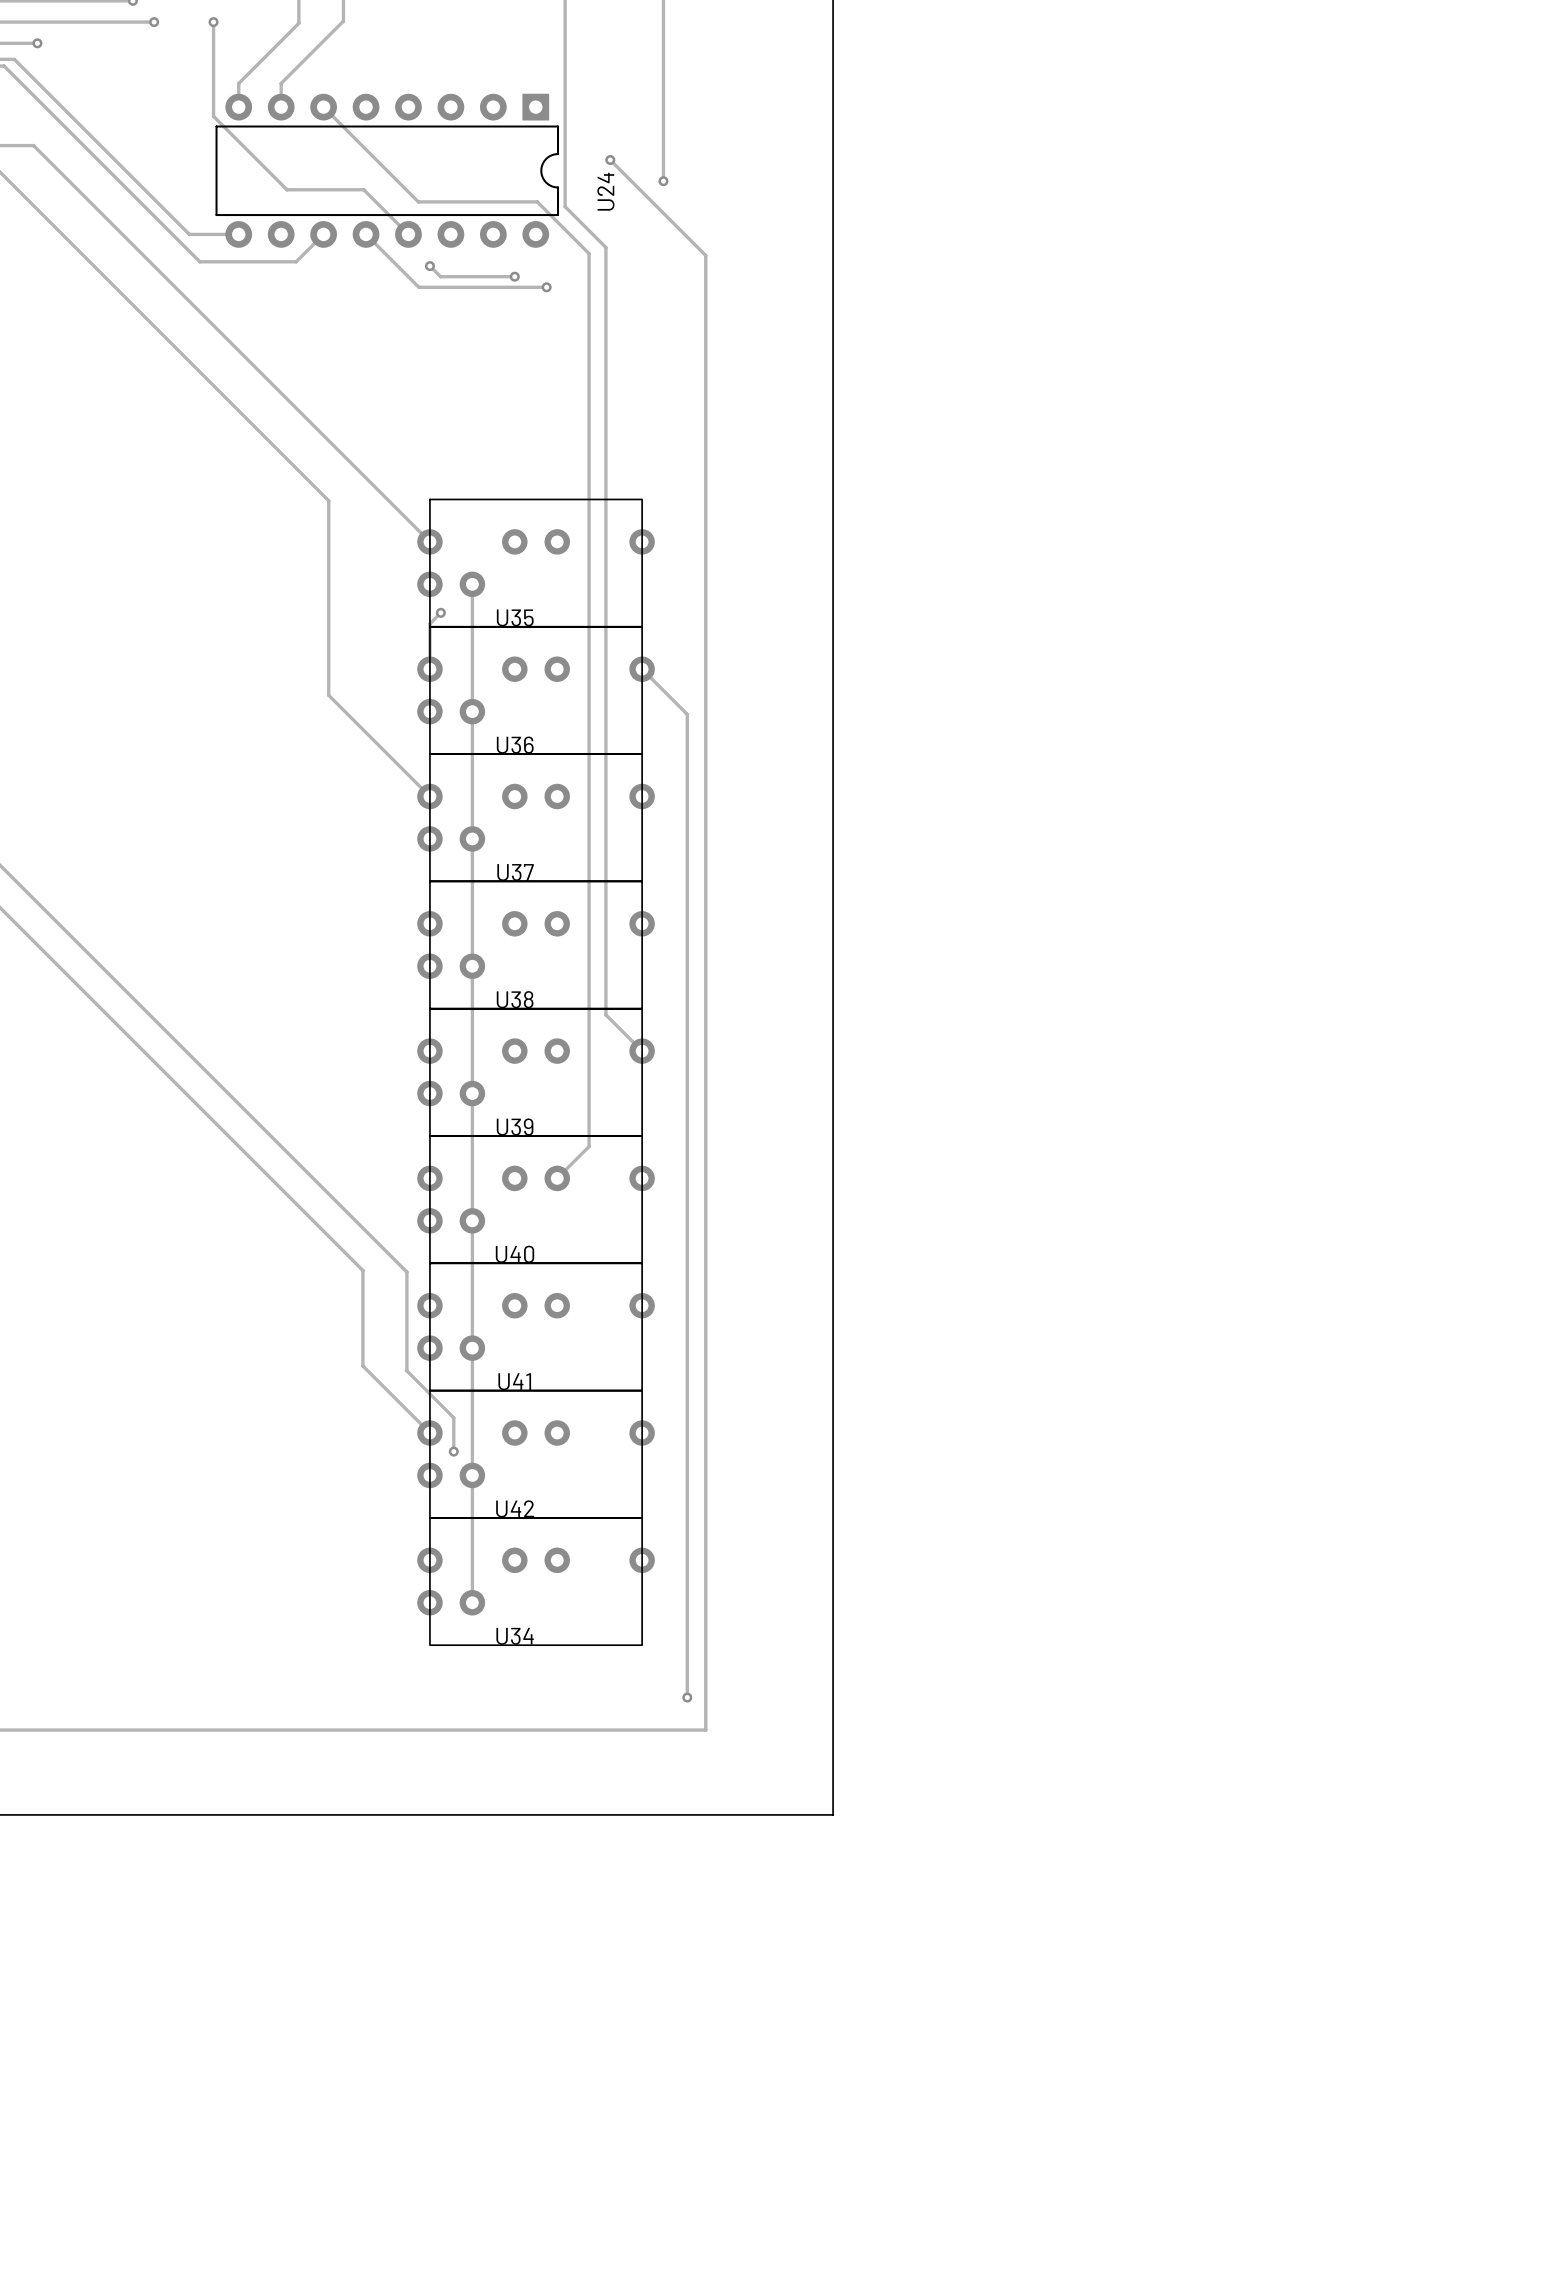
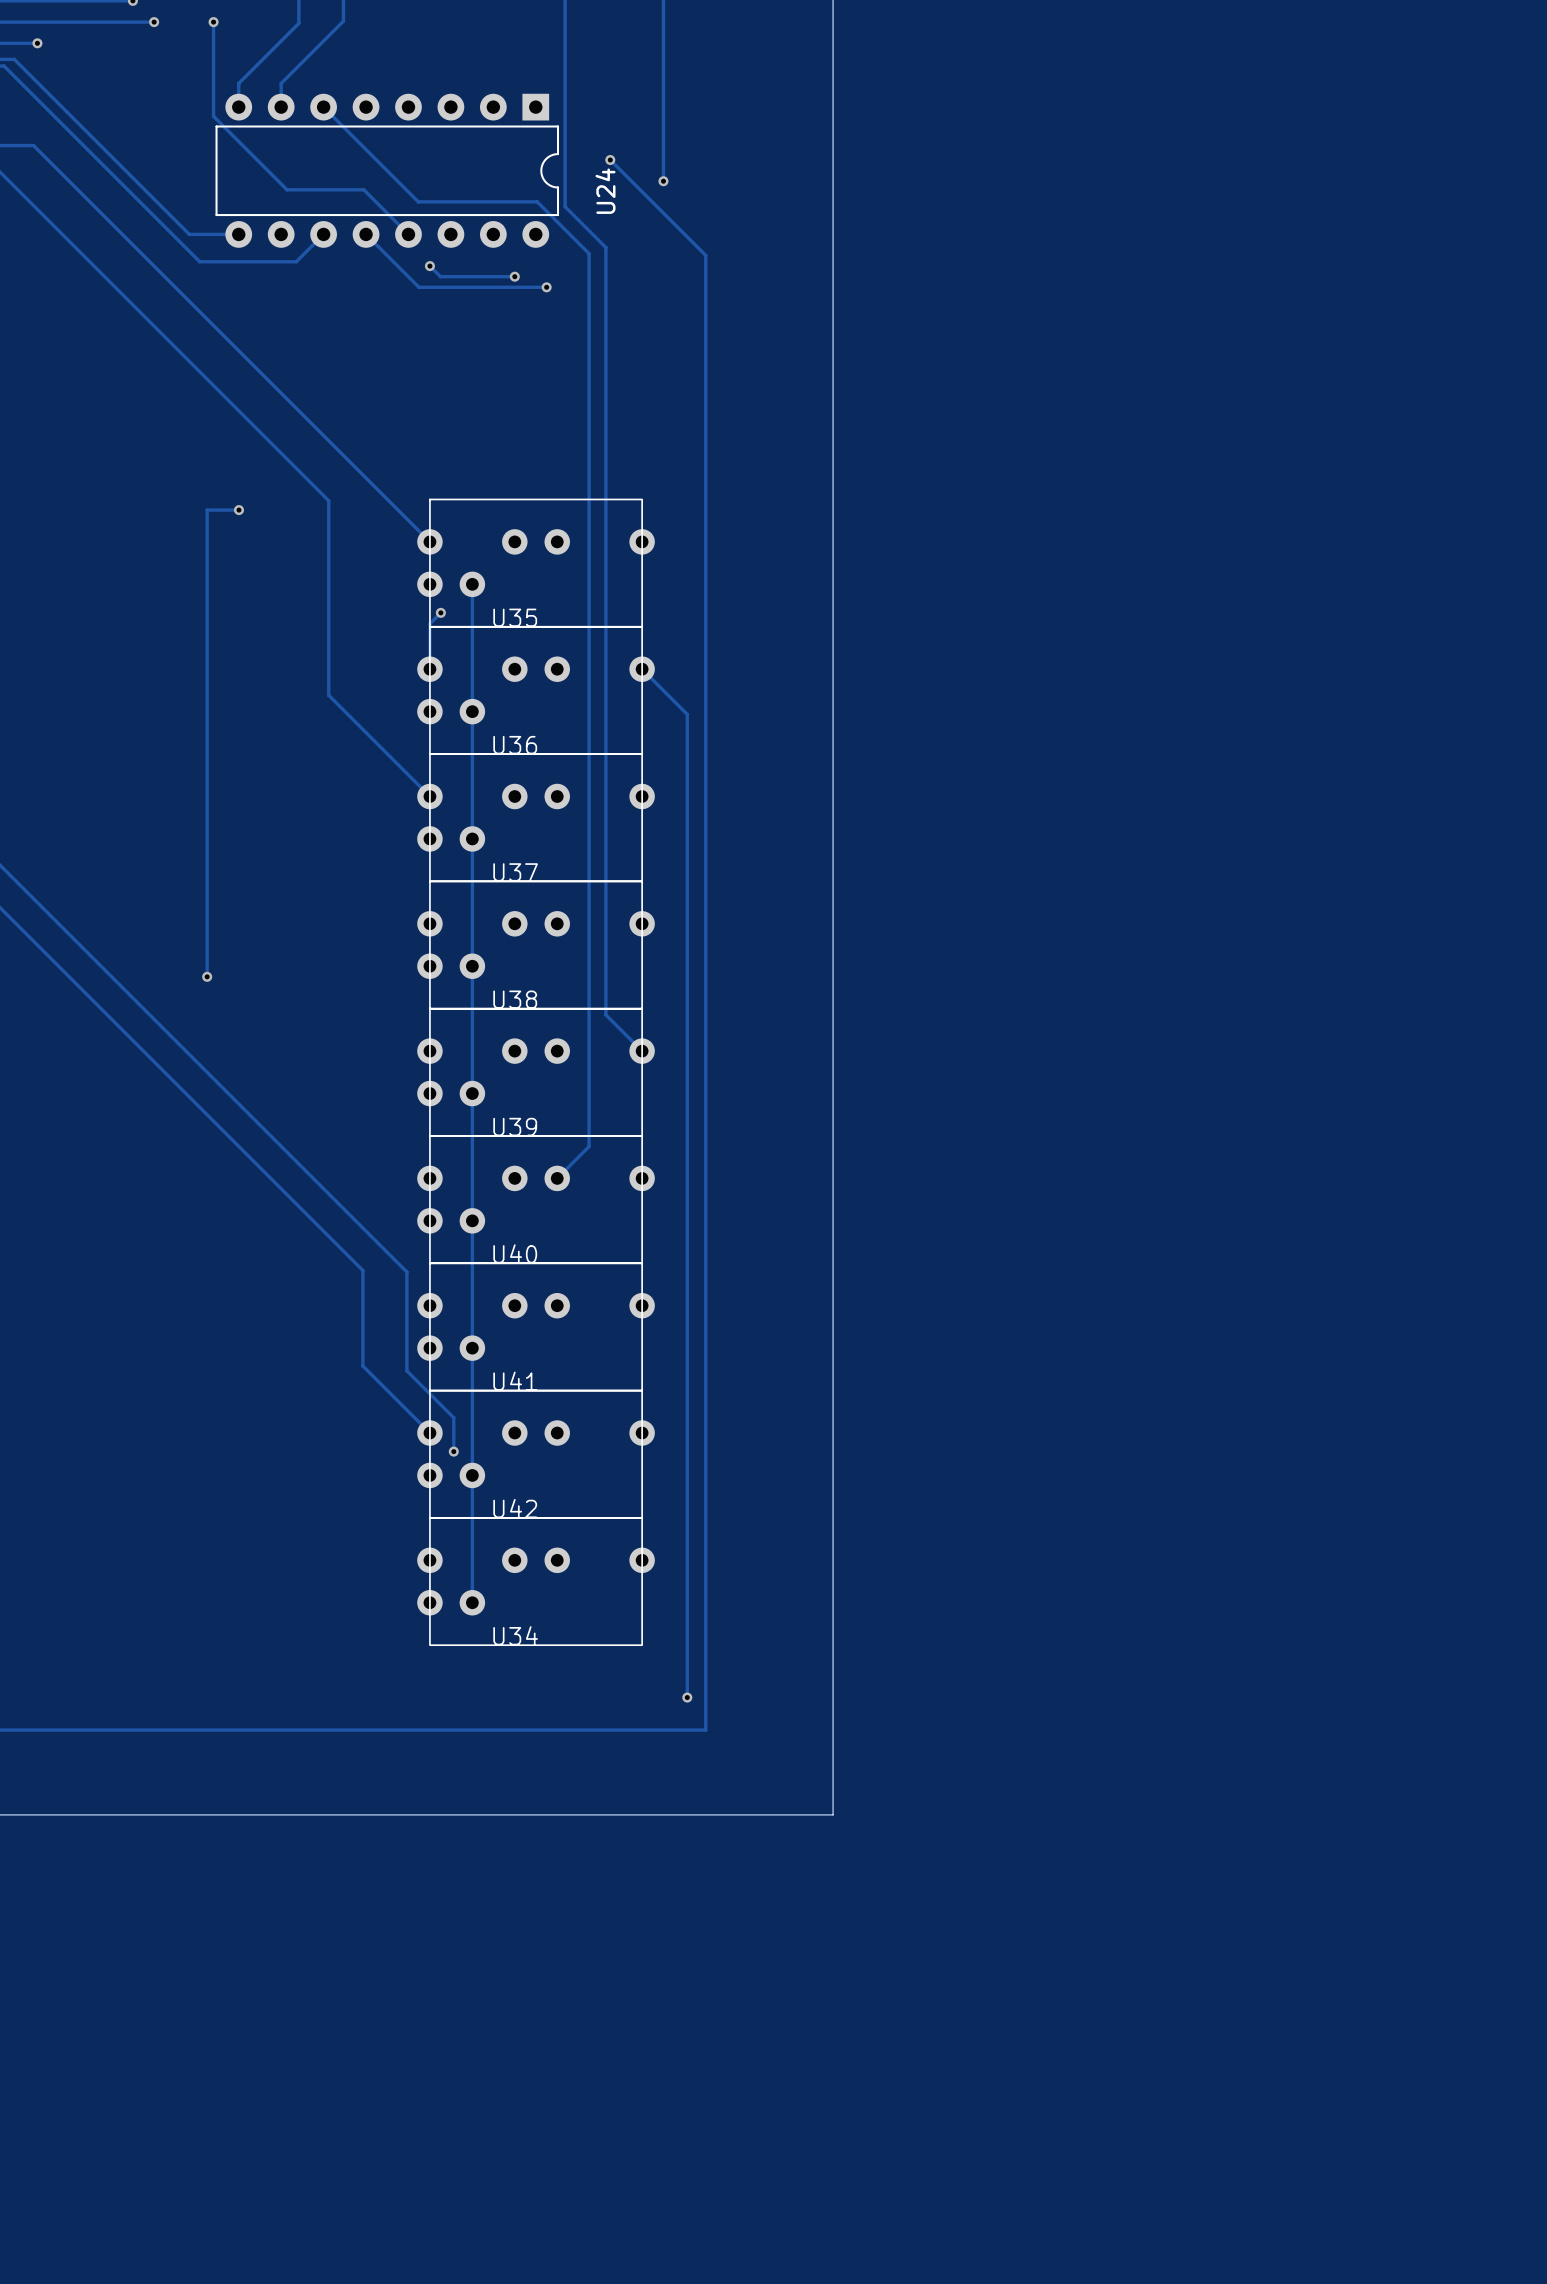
track: none -> (238, 510) (207, 510) (207, 976)
via: none -> (238, 510)
via: none -> (207, 976)

